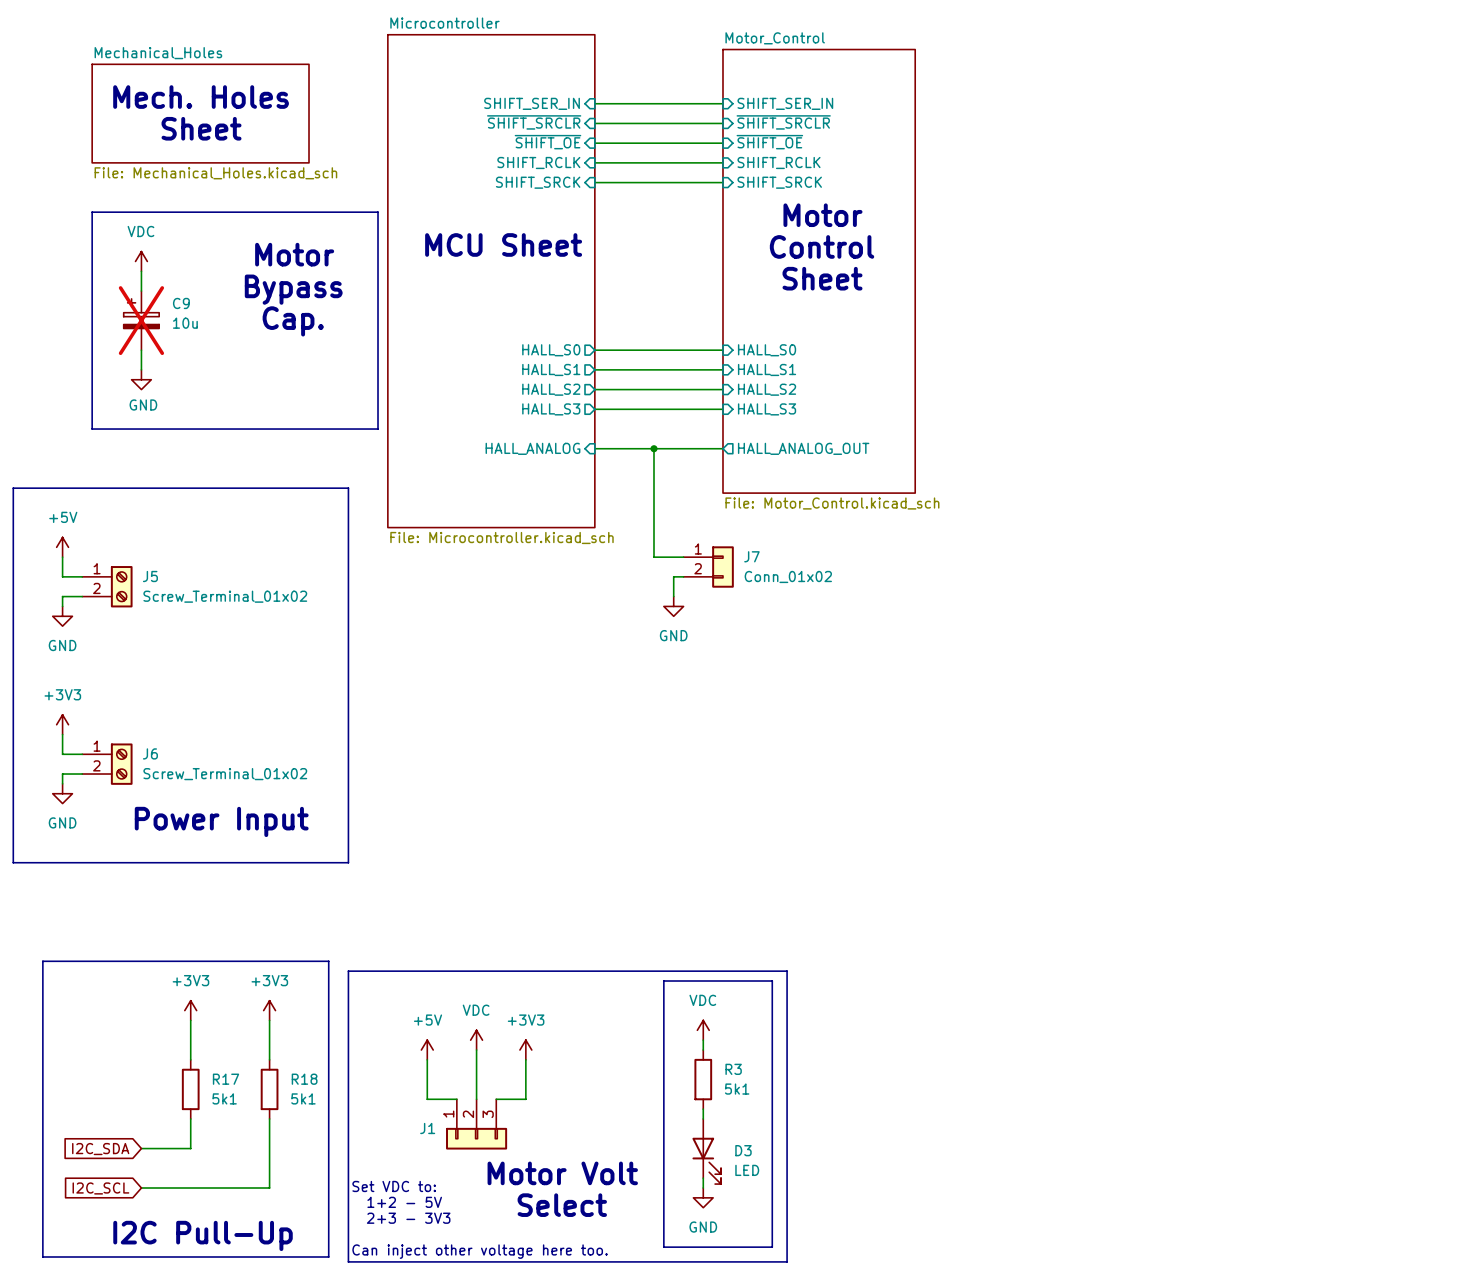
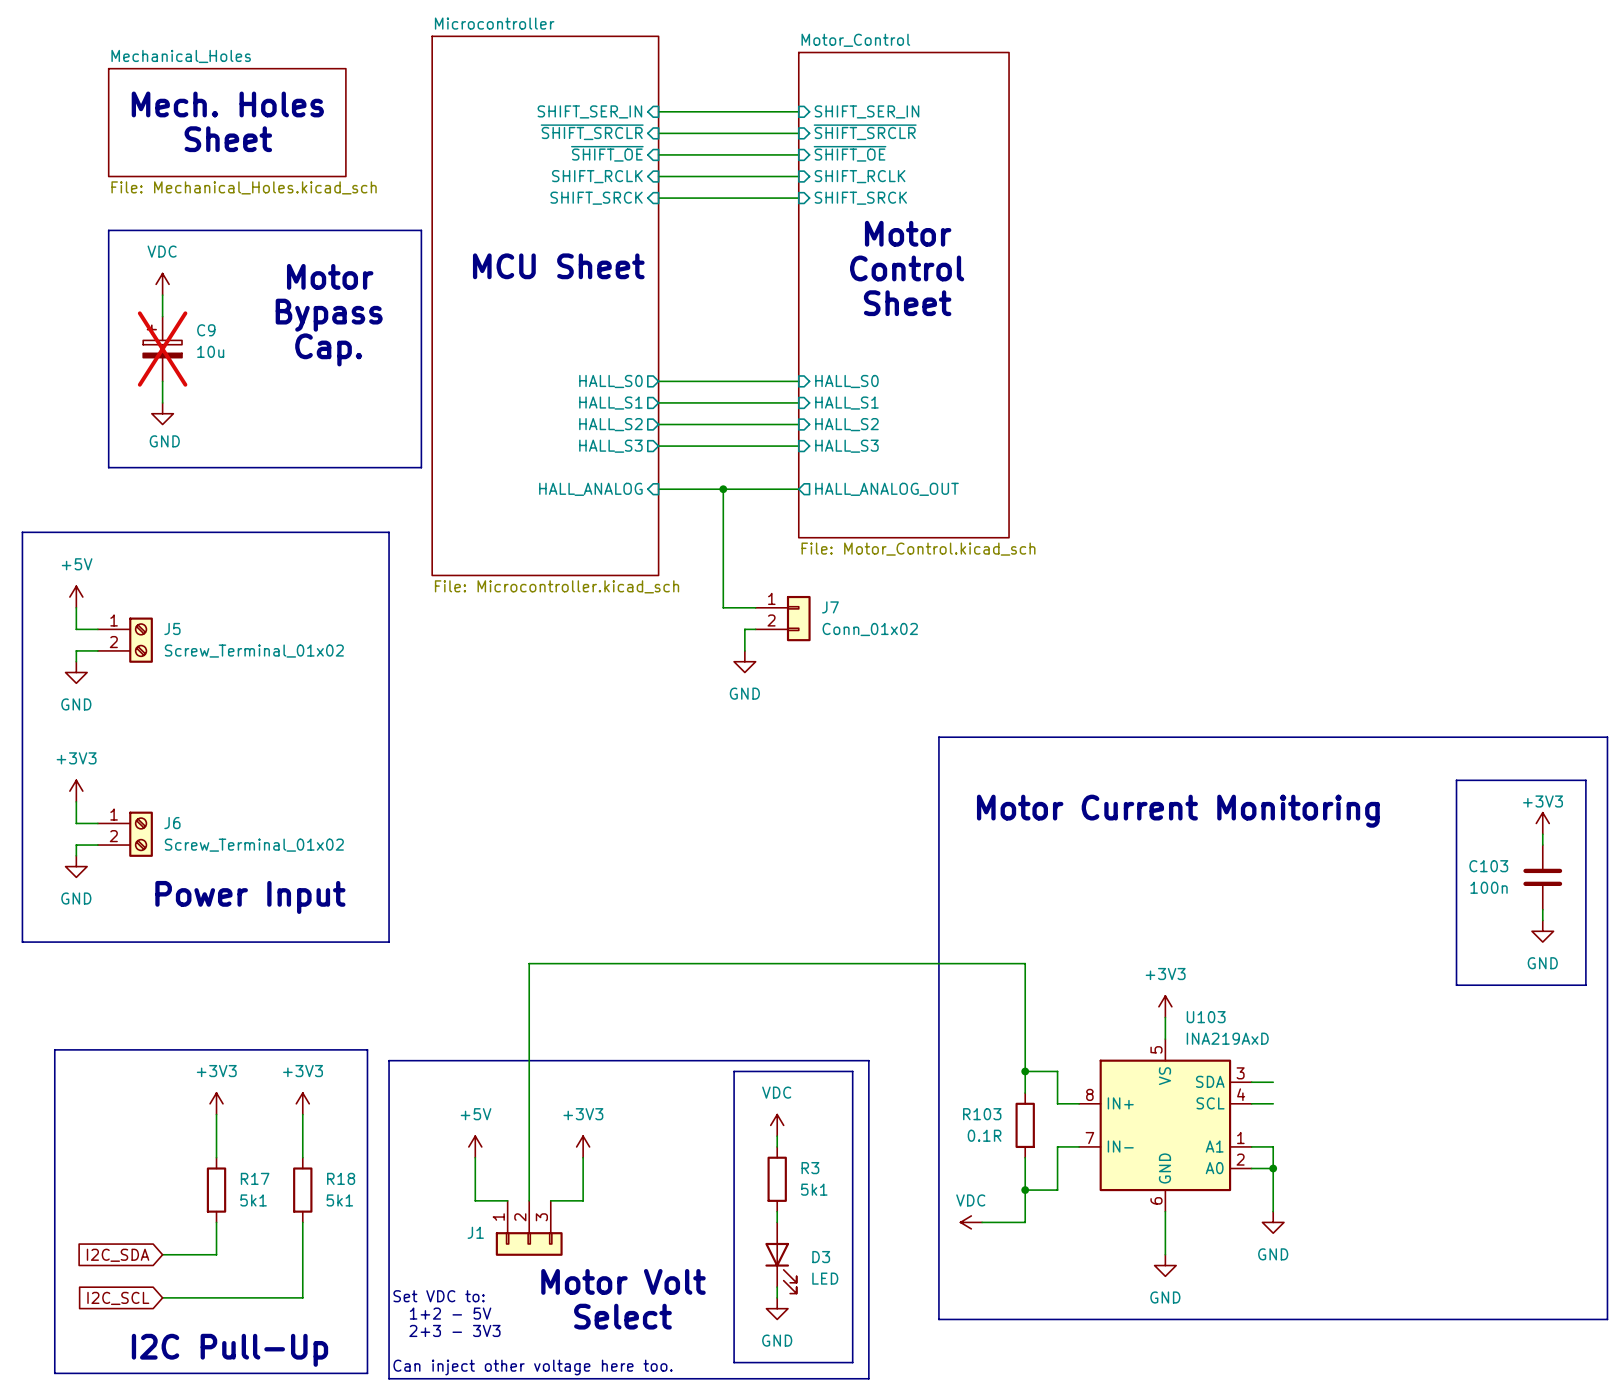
line: none -> (938, 737) (1607, 737) (1607, 1319) (938, 1319) (938, 737)
line: none -> (1456, 780) (1585, 780) (1585, 985) (1456, 985) (1456, 780)
text: none -> Motor Current Monitoring (1178, 811)
power symbol: none -> +3V3 (1542, 823)
wire: none -> (1542, 834) (1542, 845)
C103: none -> 100n (1542, 877)
wire: none -> (1542, 909) (1542, 920)
power symbol: none -> GND (1542, 931)
power symbol: none -> +3V3 (1165, 1006)
wire: none -> (1165, 1017) (1165, 1039)
wire: none -> (1025, 1071) (1057, 1071) (1057, 1103) (1079, 1103)
junction: none -> (1025, 1071)
wire: none -> (1251, 1082) (1273, 1082)
wire: none -> (1025, 1093) (1025, 963) (529, 963) (529, 1146)
wire: none -> (1251, 1103) (1273, 1103)
R103: none -> 0.1R (1025, 1125)
U103: none -> INA219AxD (1165, 1125)
power symbol: VDC (476, 1040) -> none
wire: none -> (1079, 1146) (1057, 1146) (1057, 1190) (1025, 1190)
wire: none -> (1251, 1146) (1273, 1146) (1273, 1211)
wire: none -> (1025, 1157) (1025, 1222) (982, 1222)
wire: none -> (1251, 1168) (1273, 1168)
junction: none -> (1273, 1168)
junction: none -> (1025, 1190)
wire: none -> (1165, 1211) (1165, 1254)
power symbol: none -> VDC (971, 1222)
power symbol: none -> GND (1273, 1222)
power symbol: none -> GND (1165, 1265)

